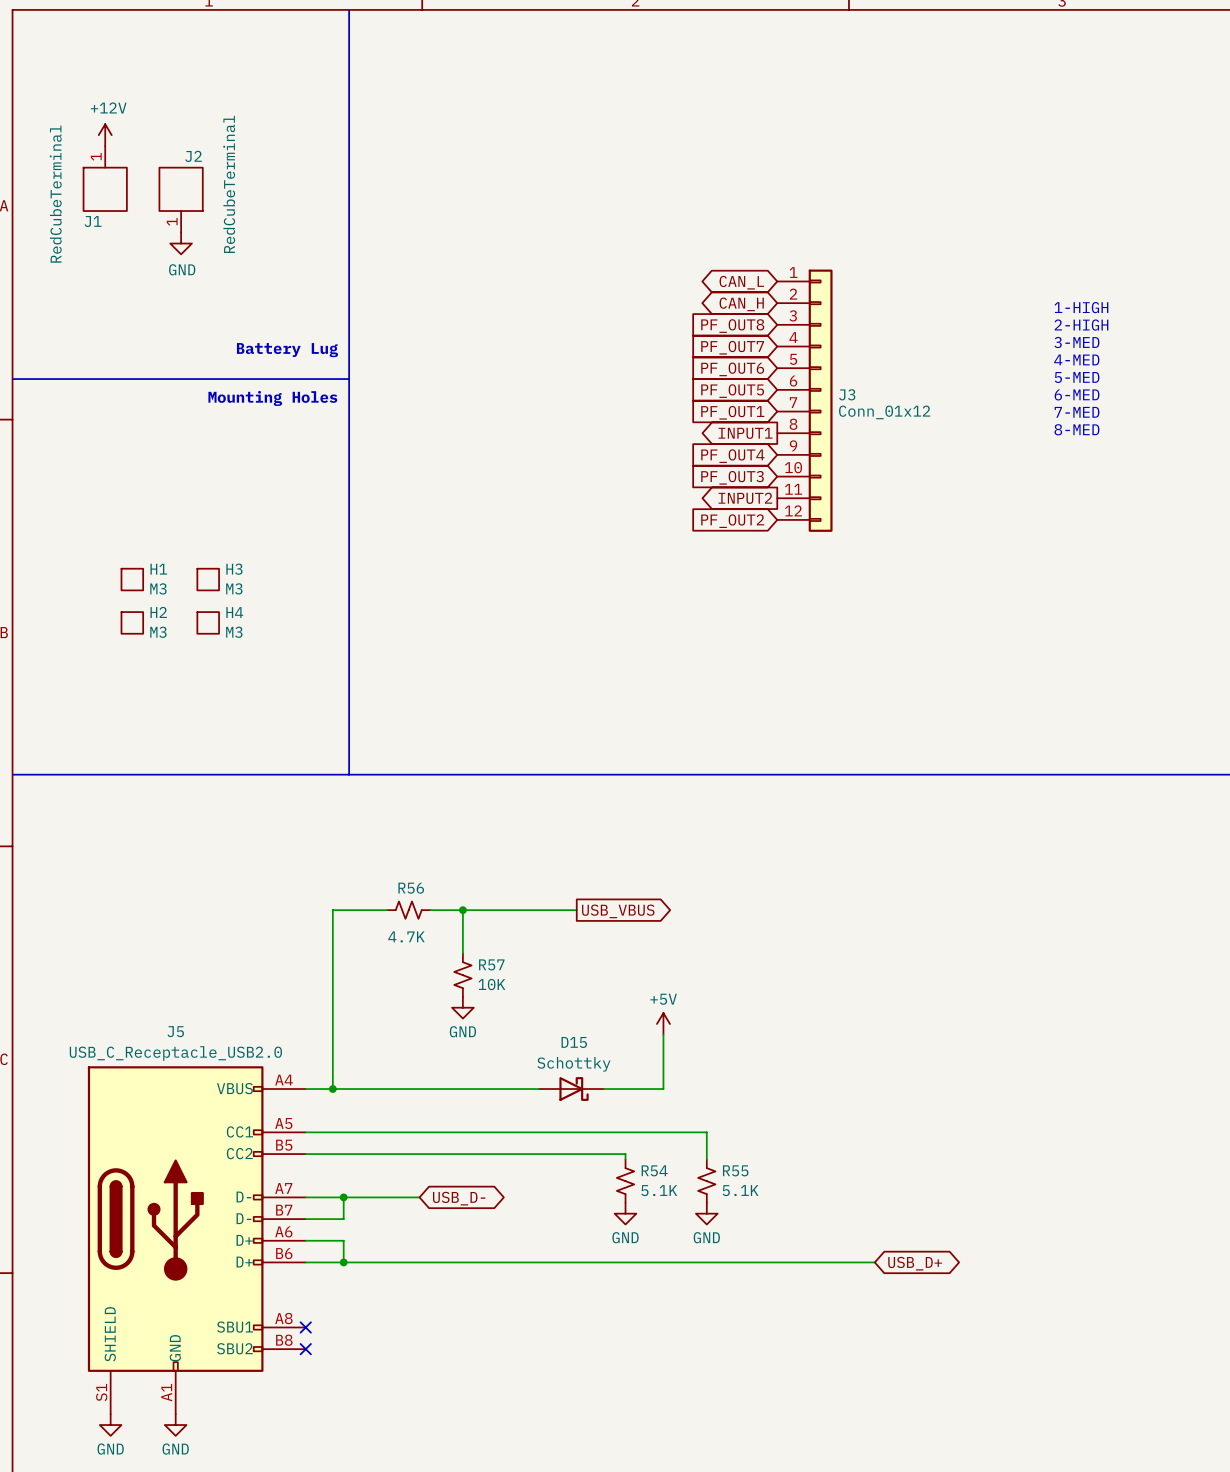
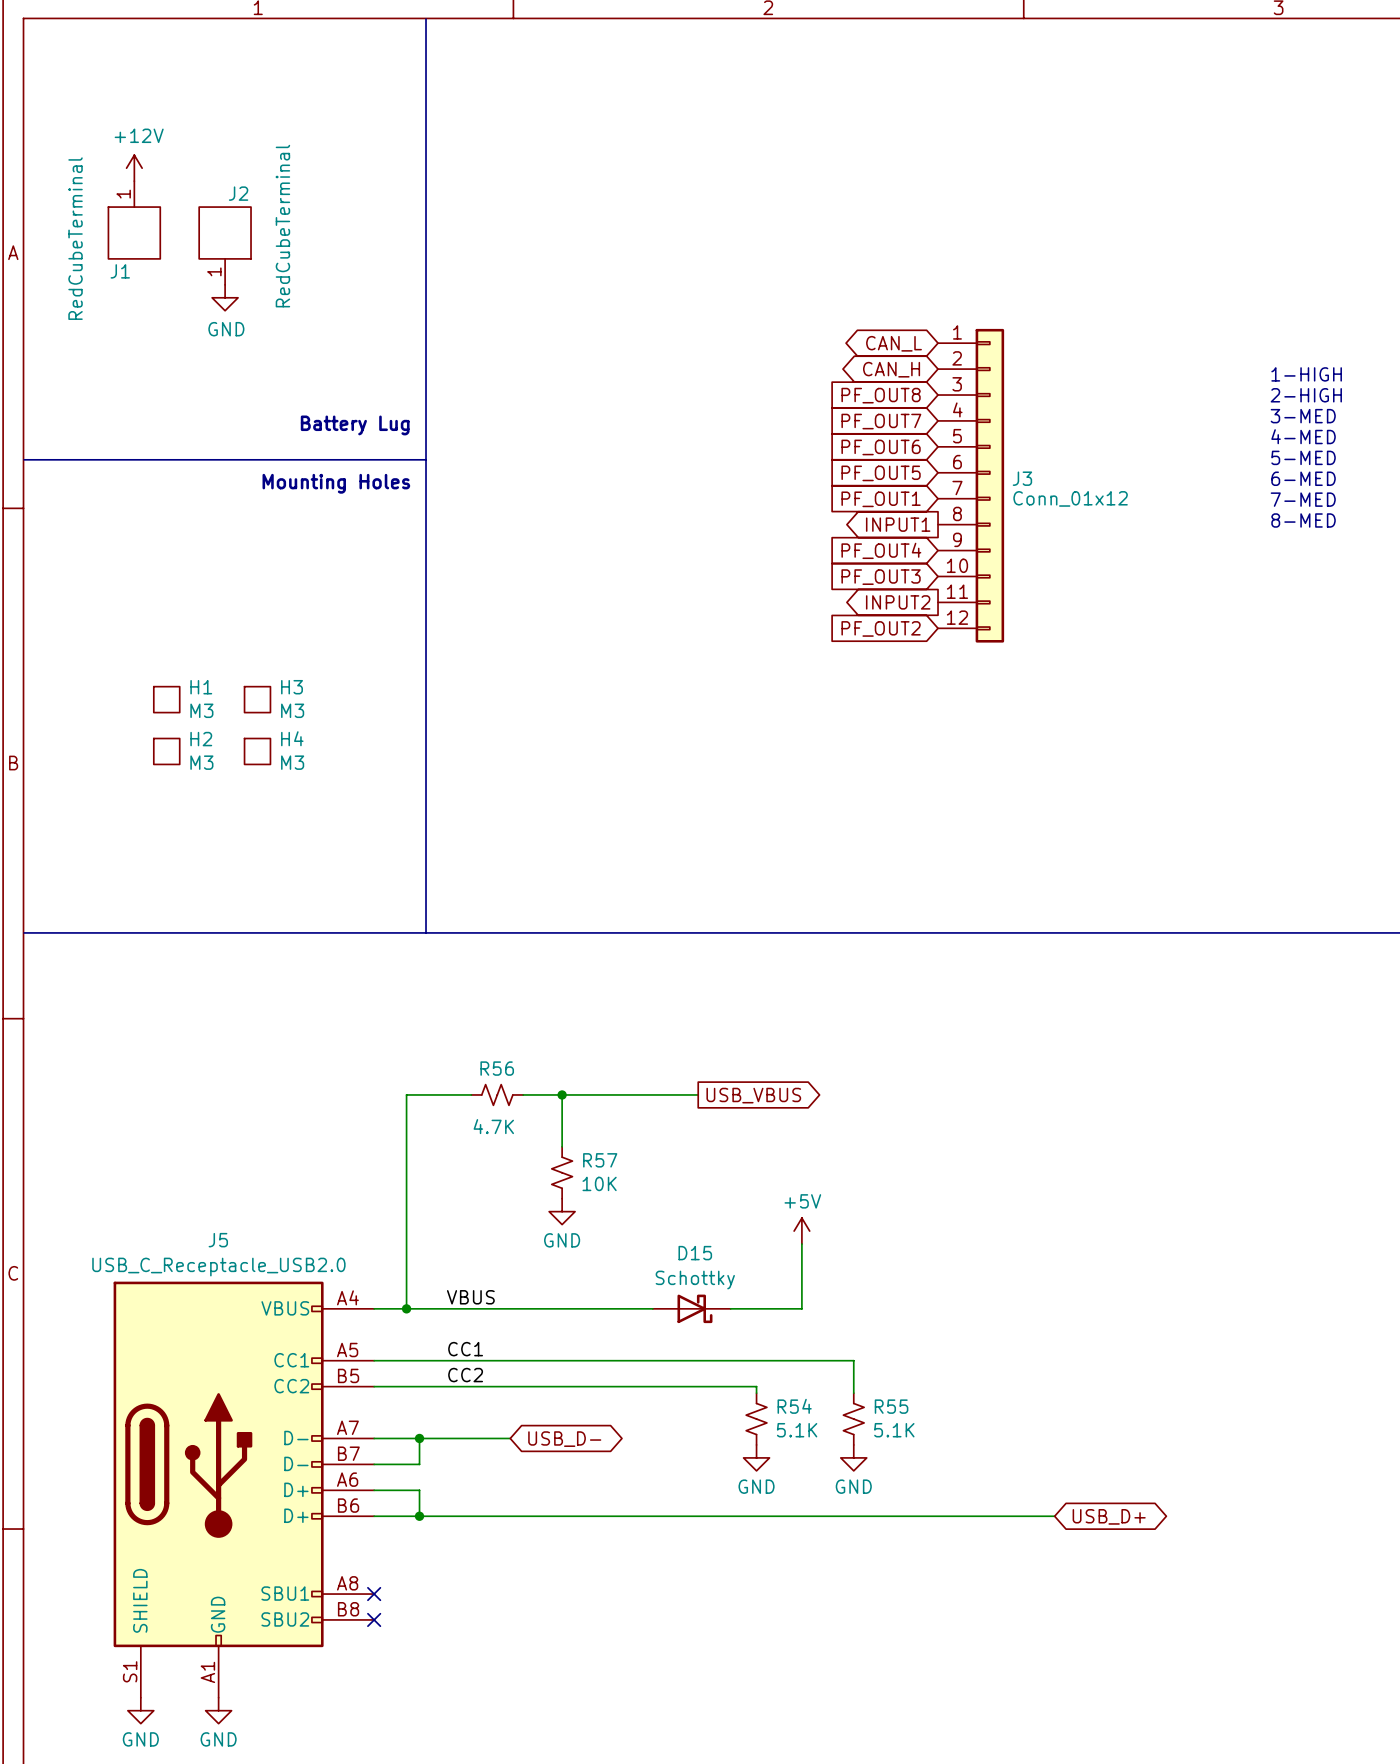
label: none -> VBUS (470, 1297)
label: none -> CC1 (465, 1349)
label: none -> CC2 (465, 1375)

